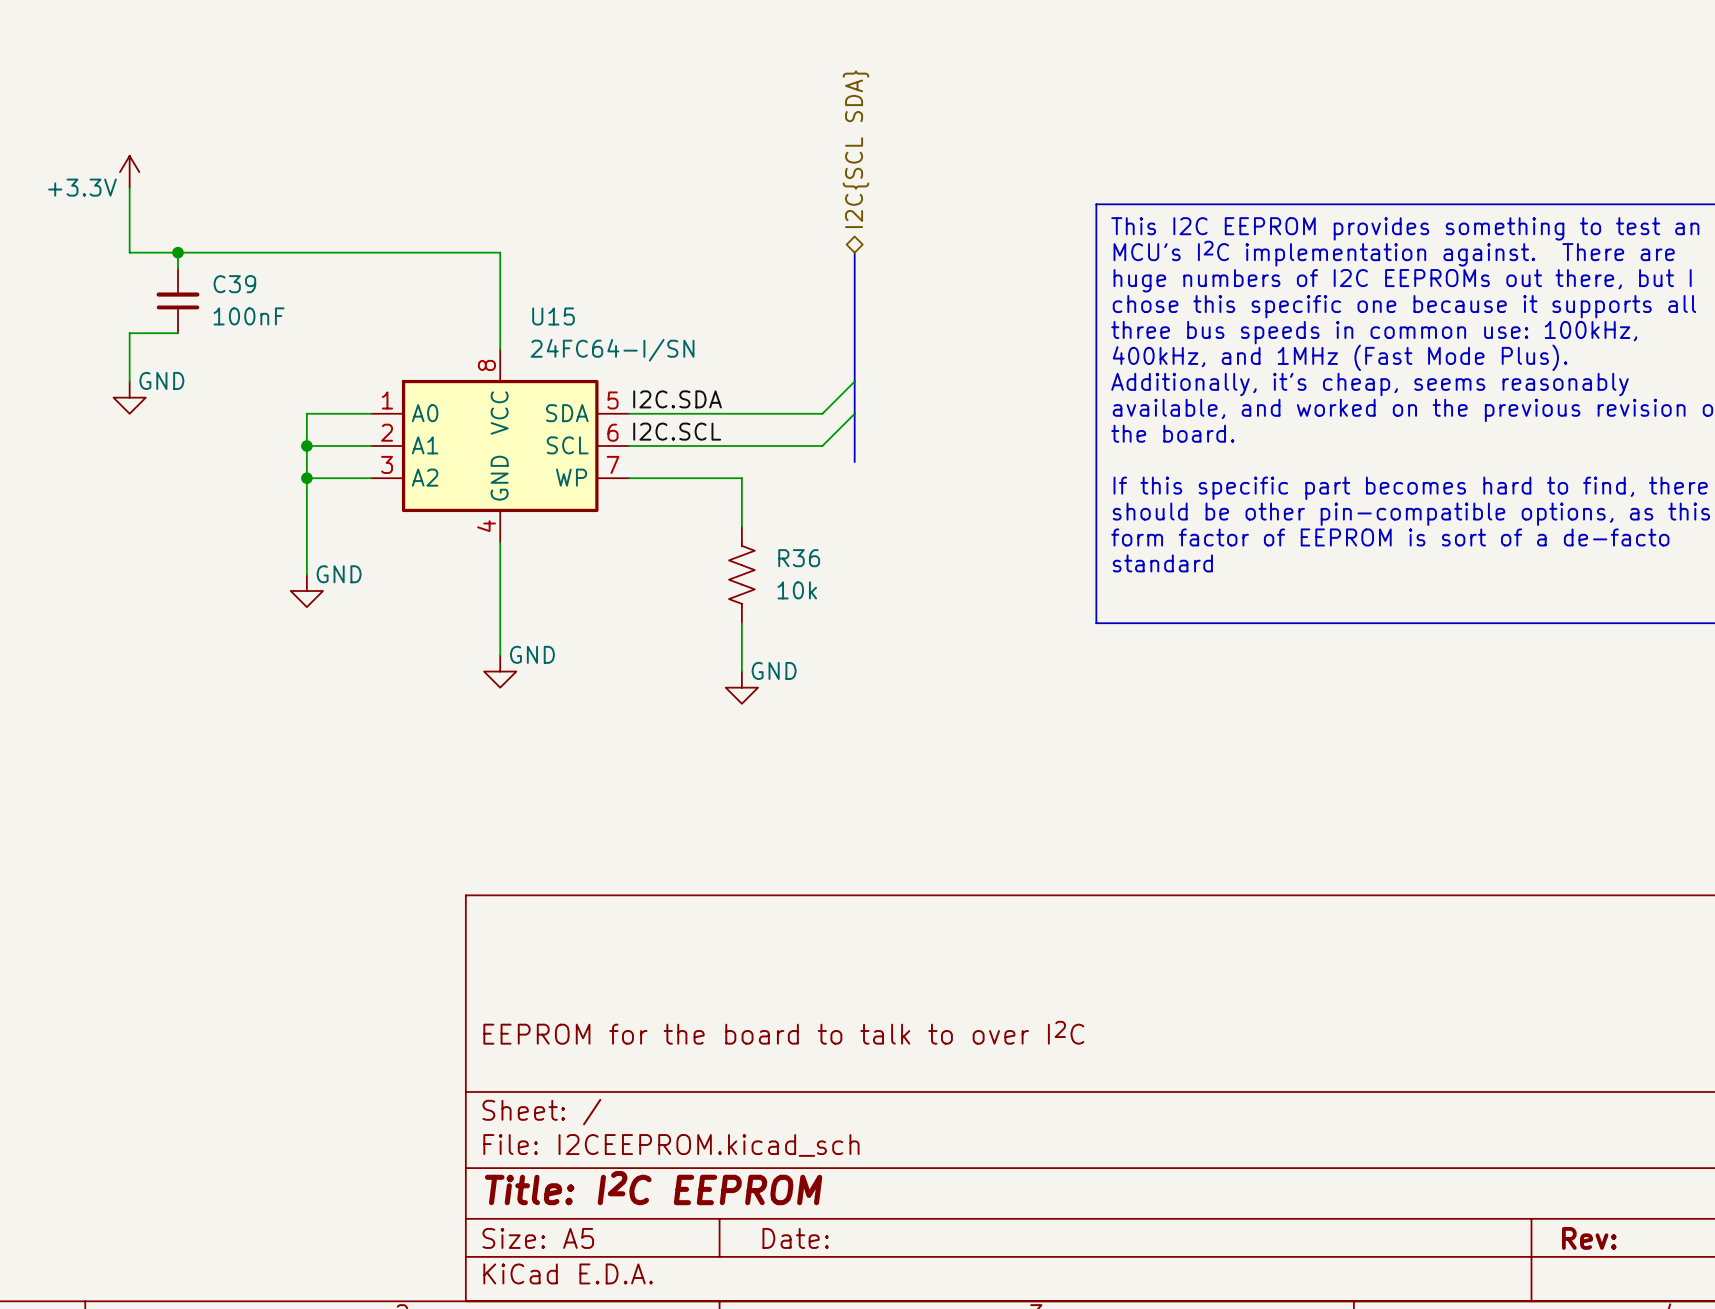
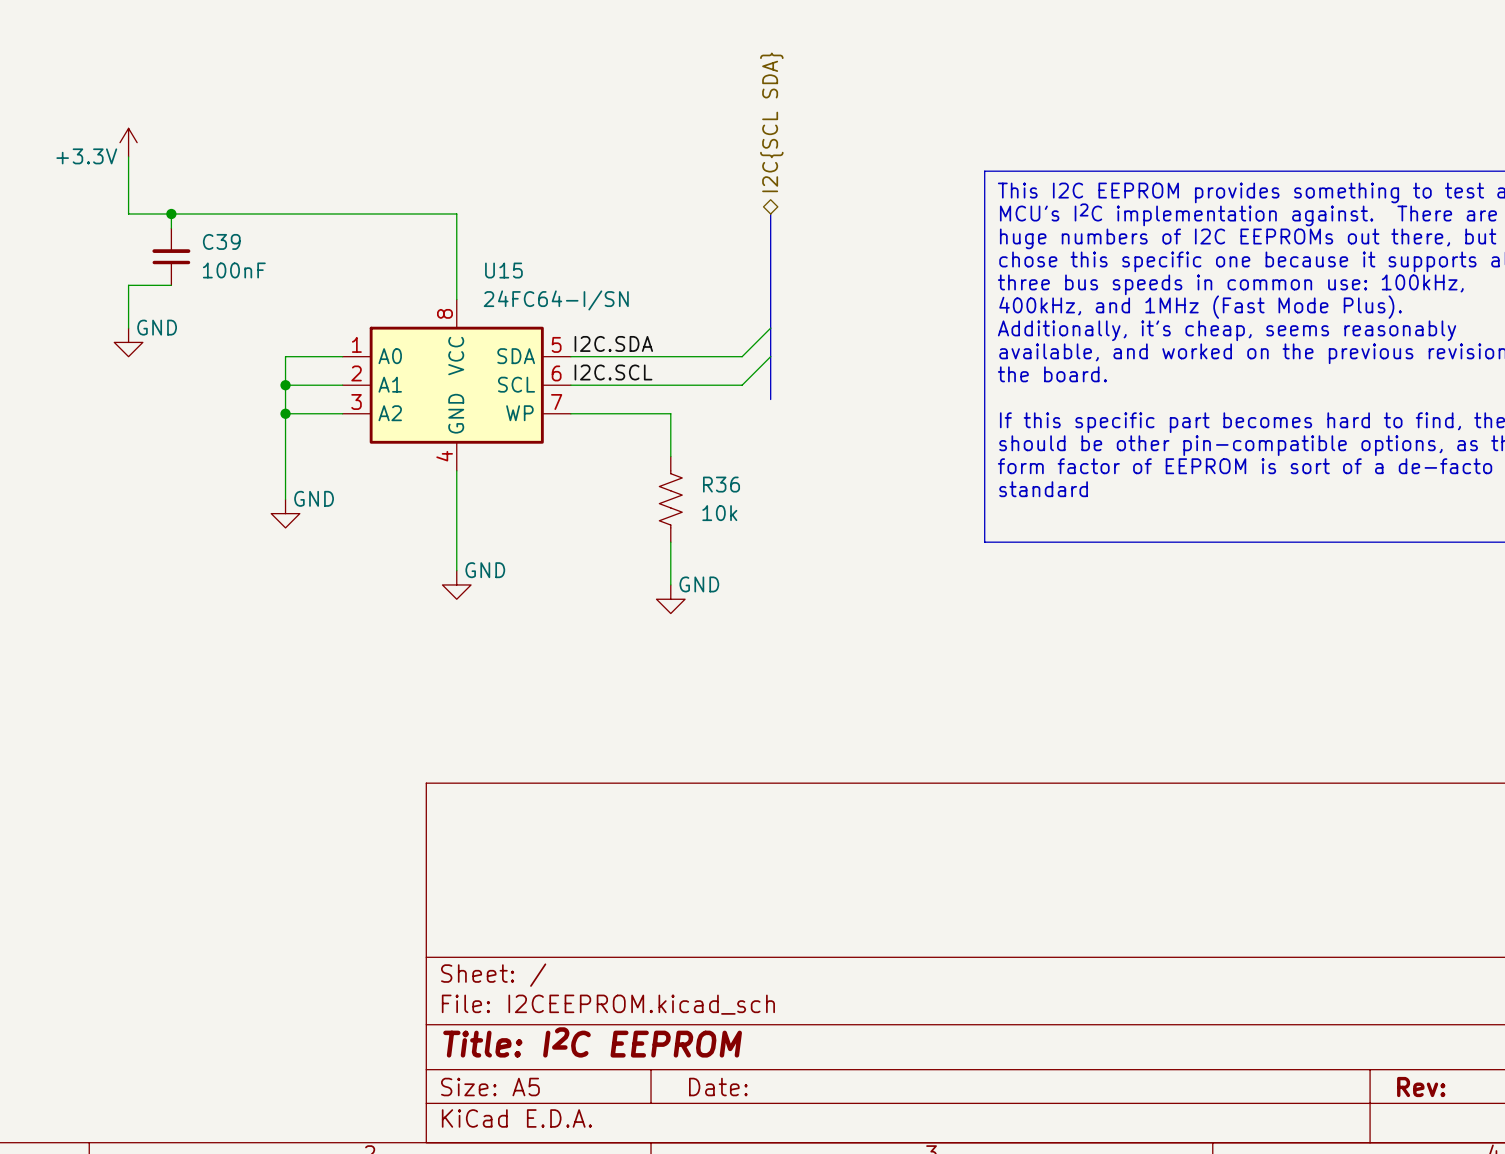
title block: EEPROM for the board to talk to over I2C (783, 1032) -> none

